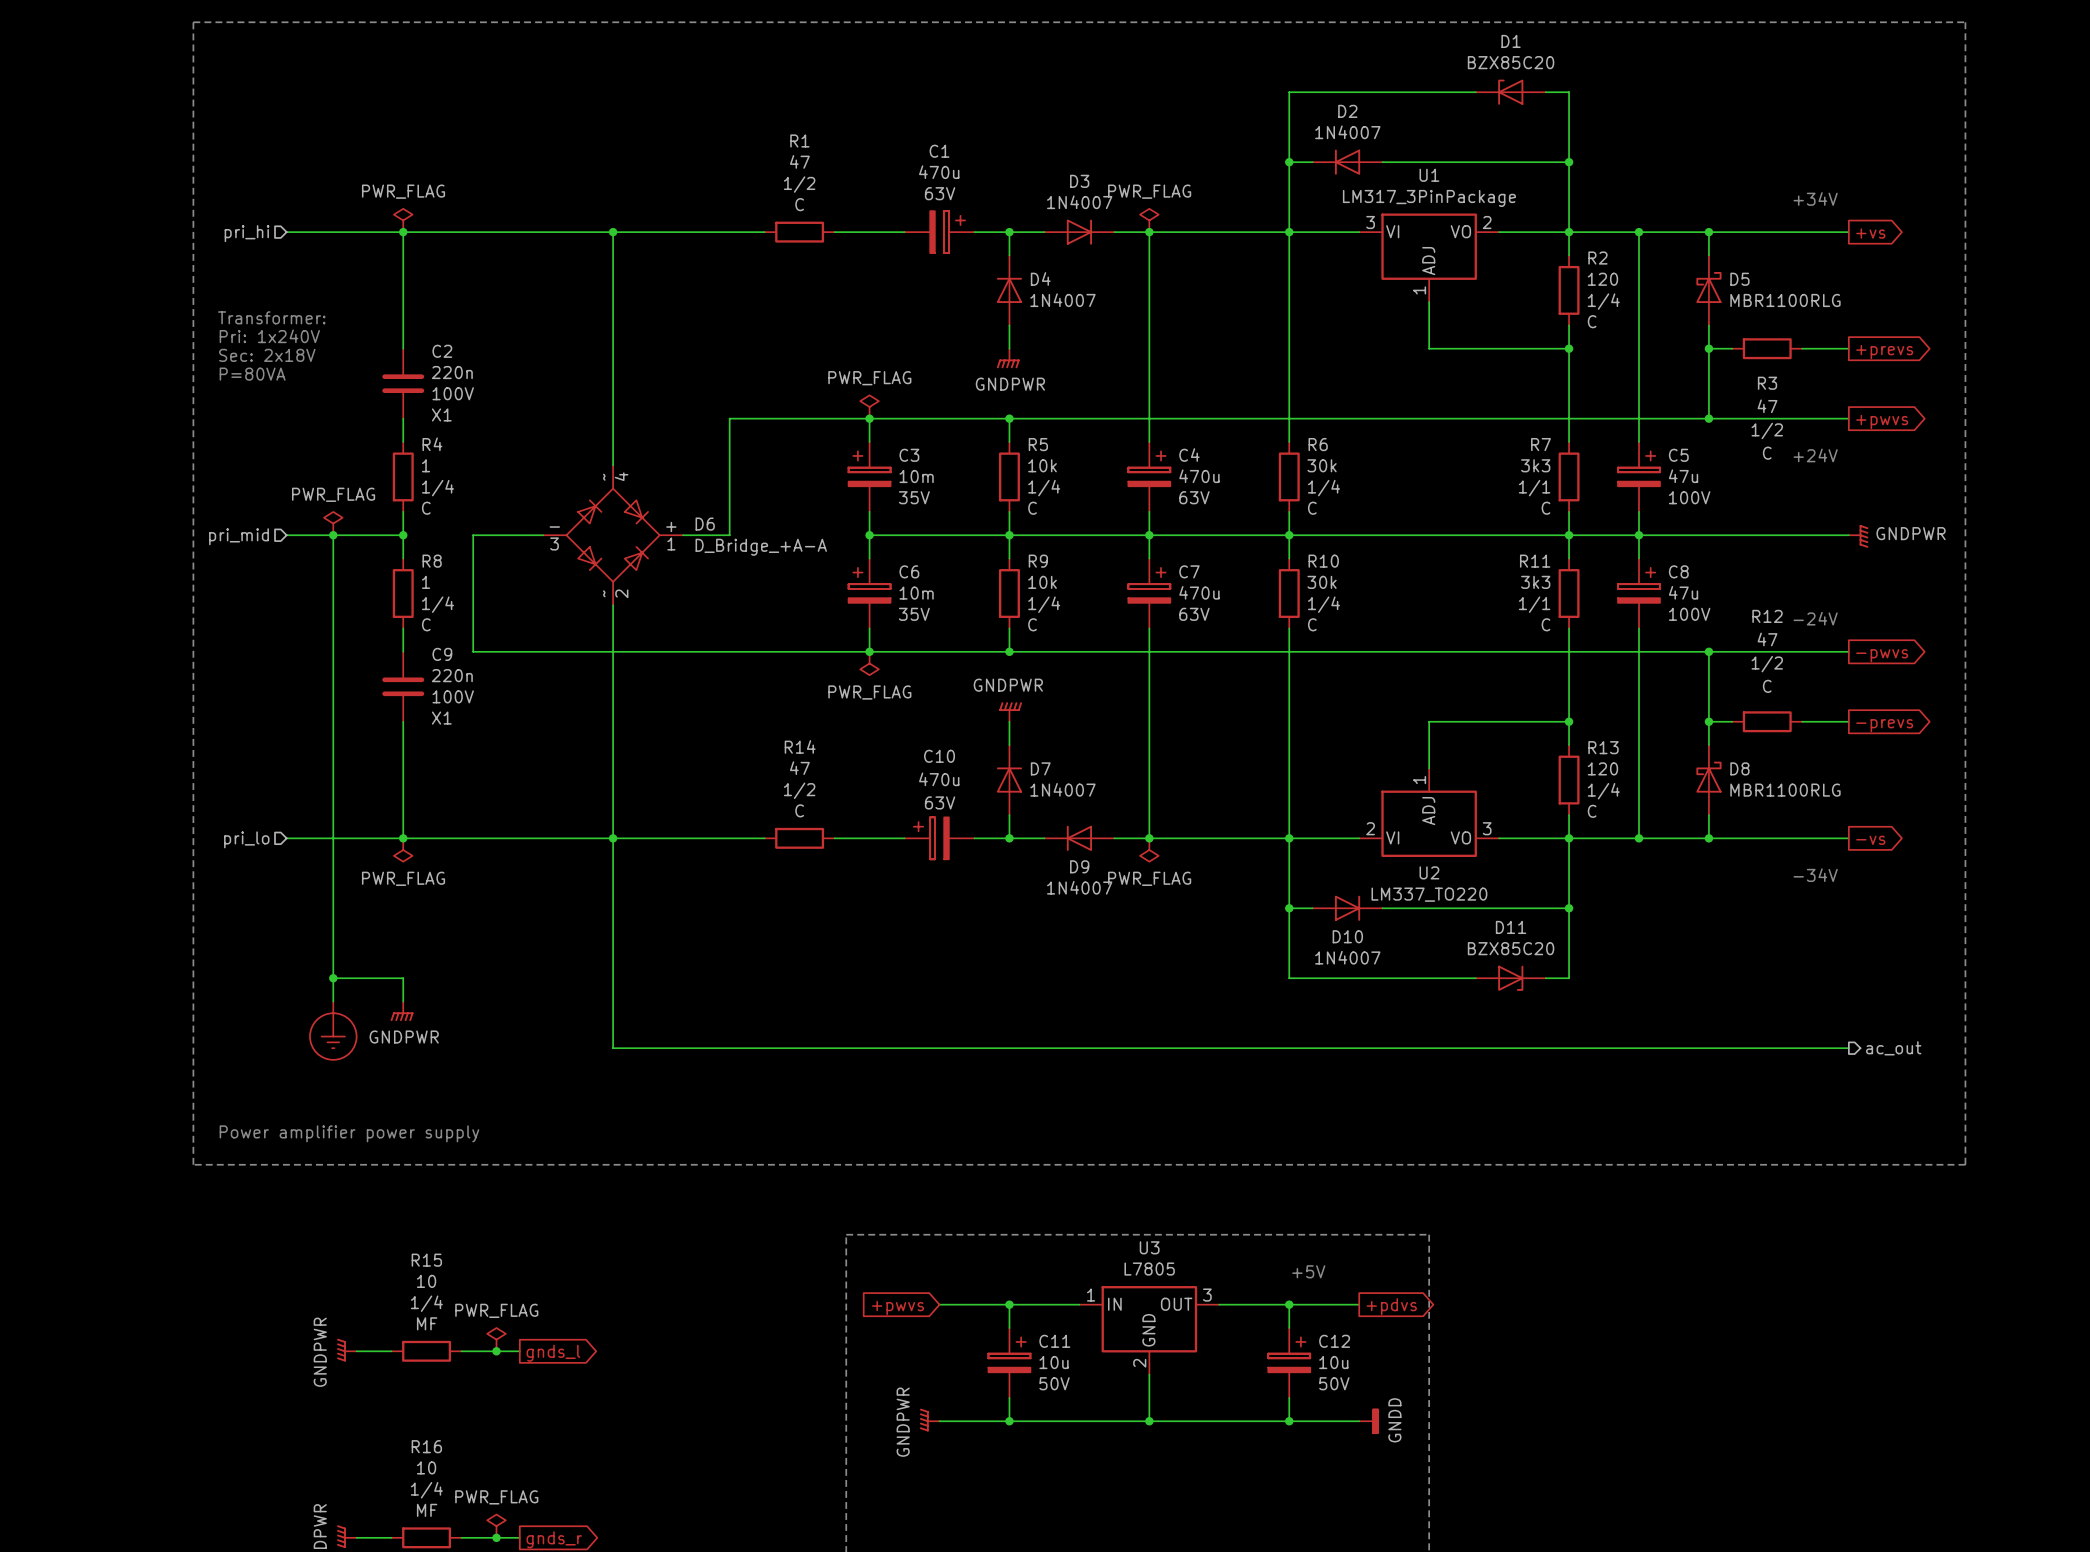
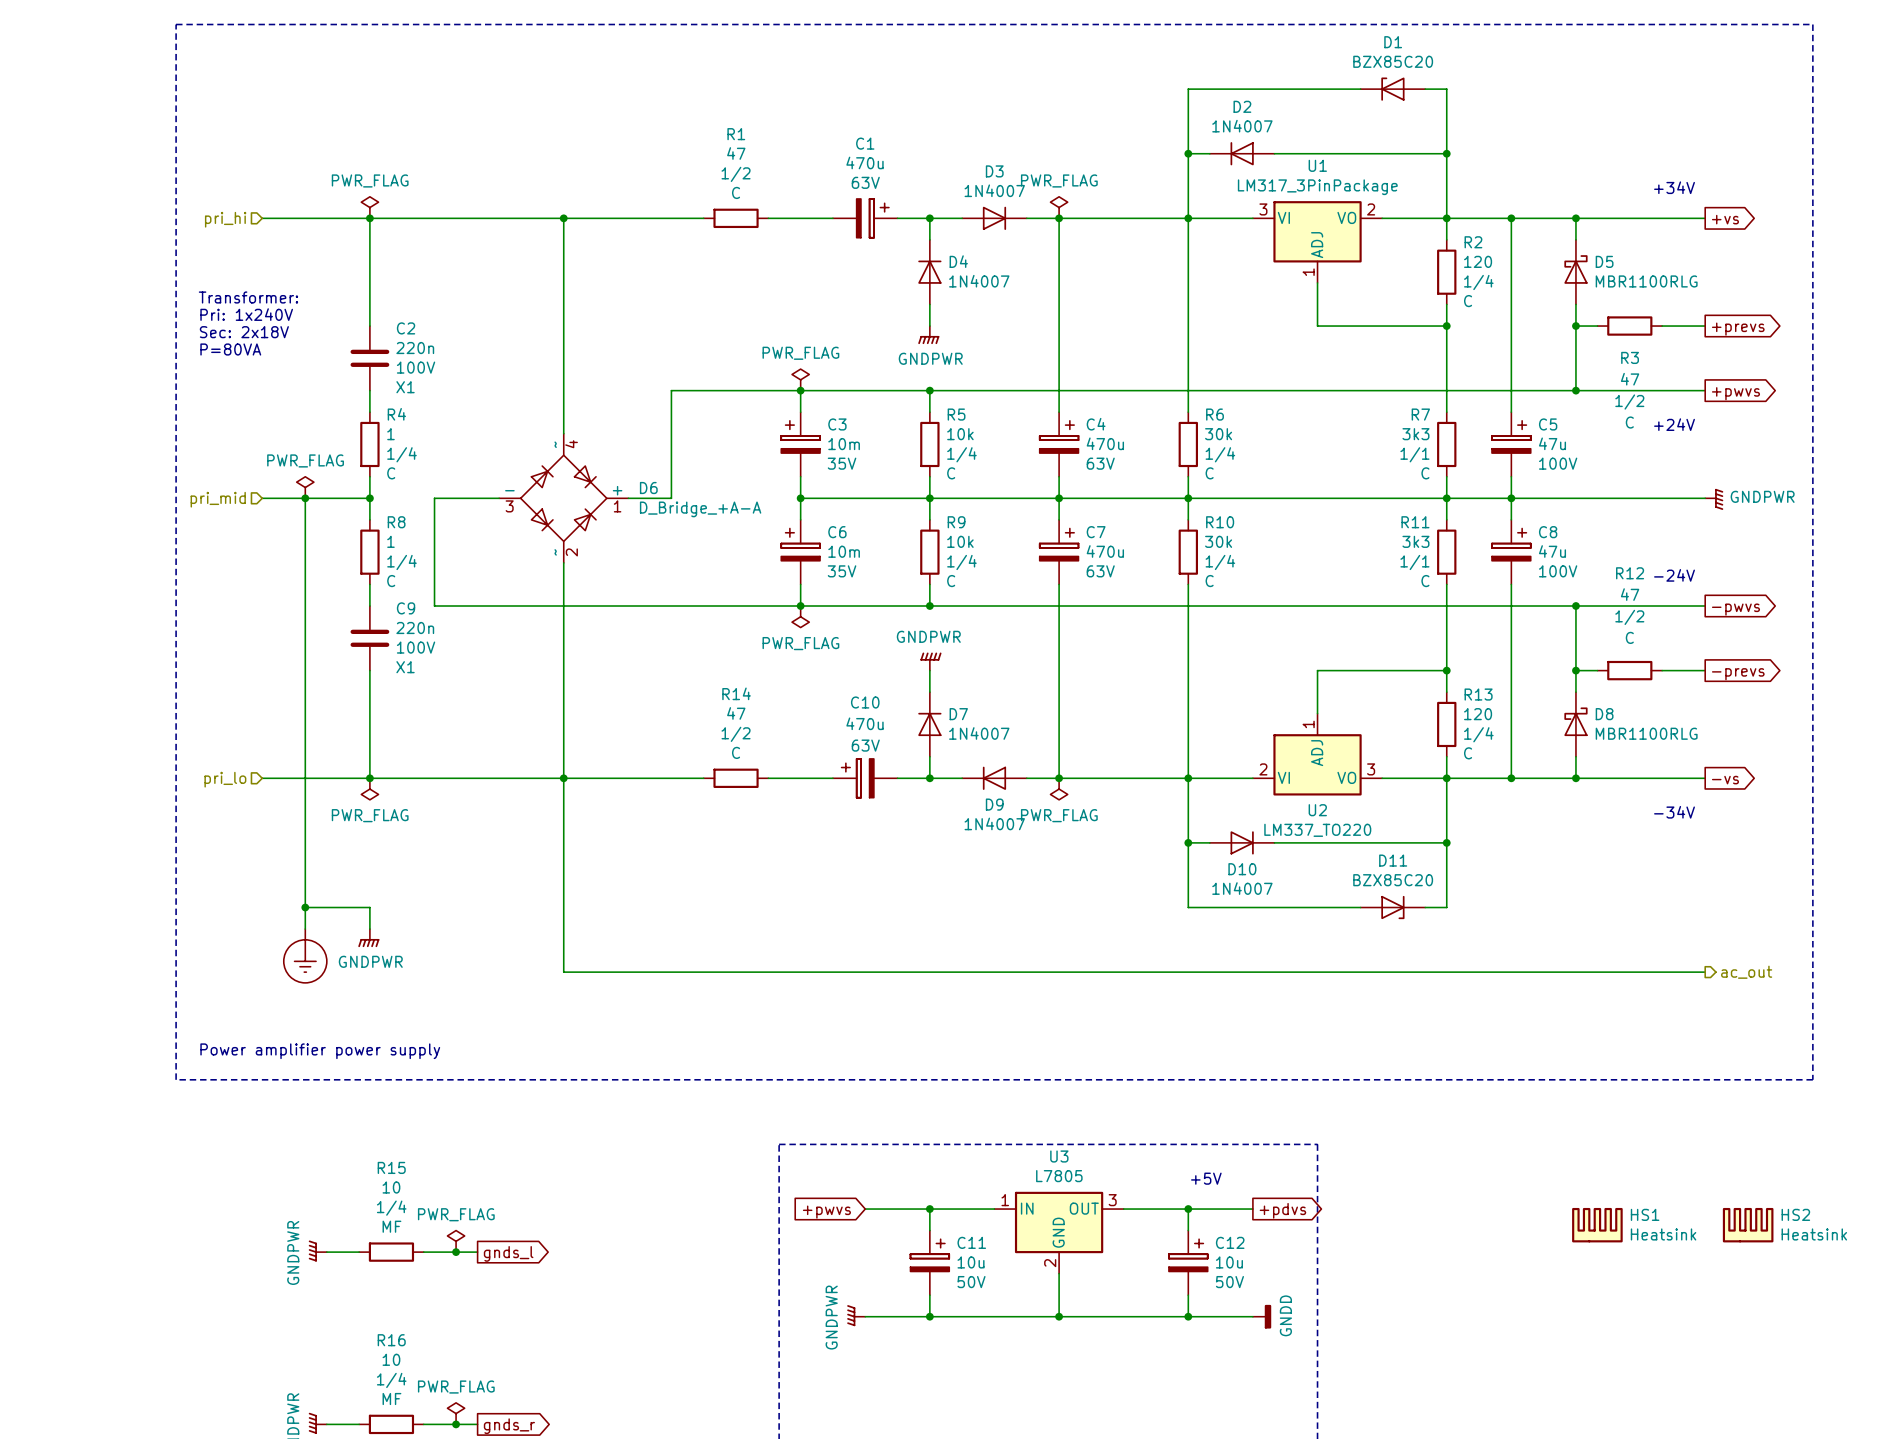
HS1: none -> Heatsink (1597, 1225)
HS2: none -> Heatsink (1748, 1225)

